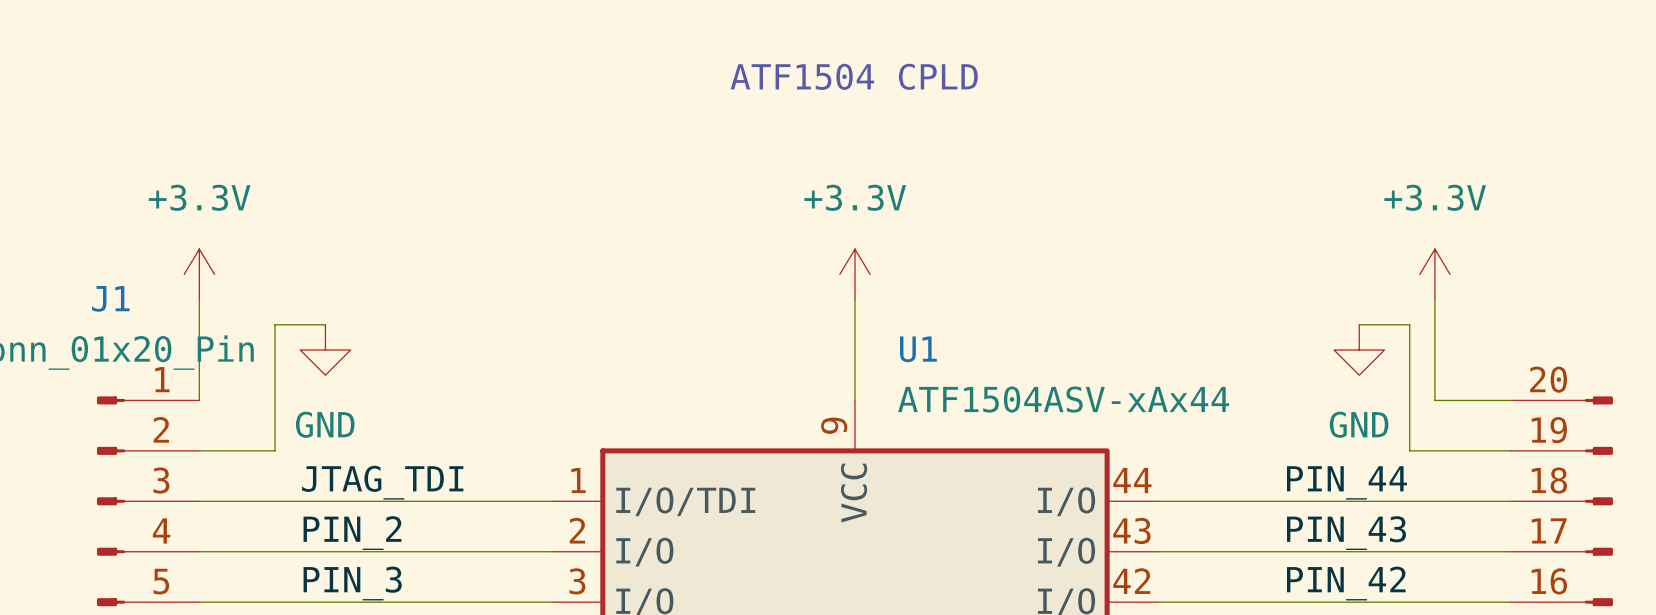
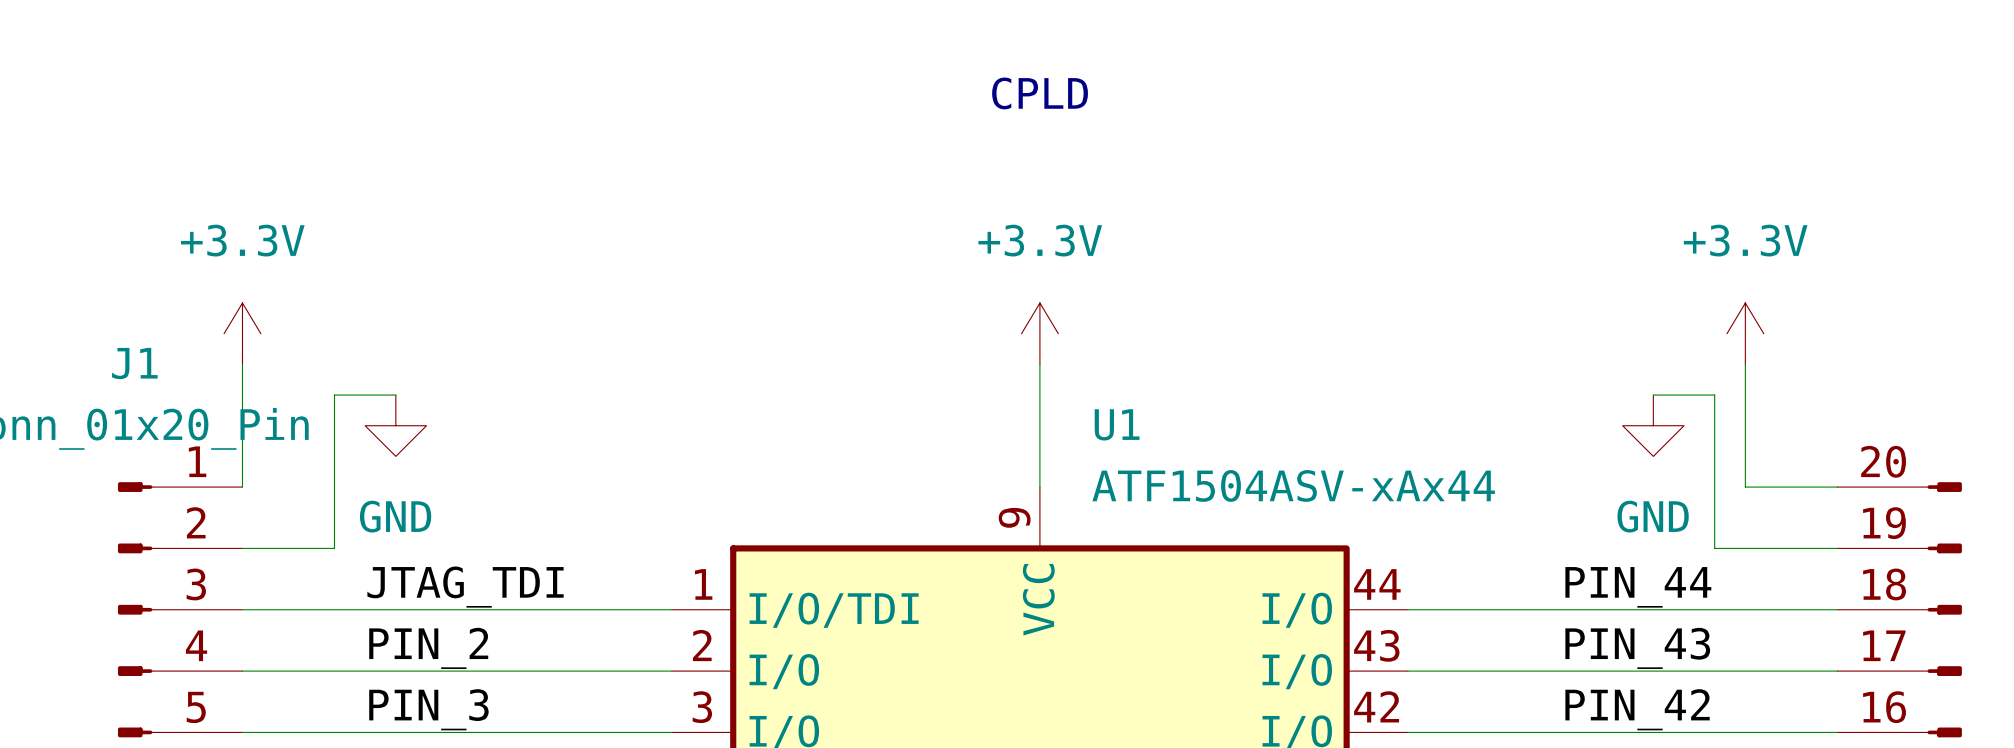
text: ATF1504 CPLD (854, 76) -> CPLD (1040, 93)

